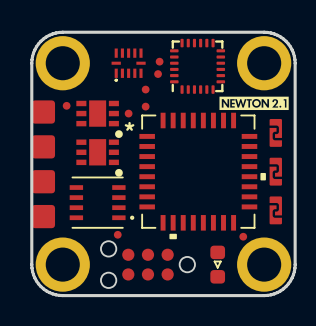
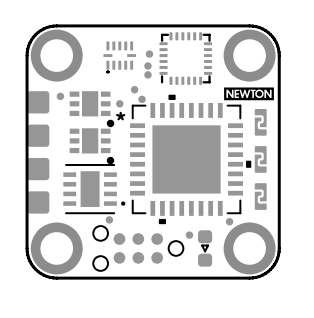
part: none -> (147, 74)
part: (145, 89) -> none
drawing shape: [219, 96, 289, 111] -> [224, 87, 274, 101]
part: none -> (134, 89)
drawing: none -> [256, 91, 263, 97]
part: (145, 106) -> none
part: none -> (142, 99)
part footprint: [139, 112, 266, 240] -> [130, 94, 252, 225]
part footprint: [69, 176, 135, 229] -> [63, 164, 126, 215]
part: none -> (189, 235)

